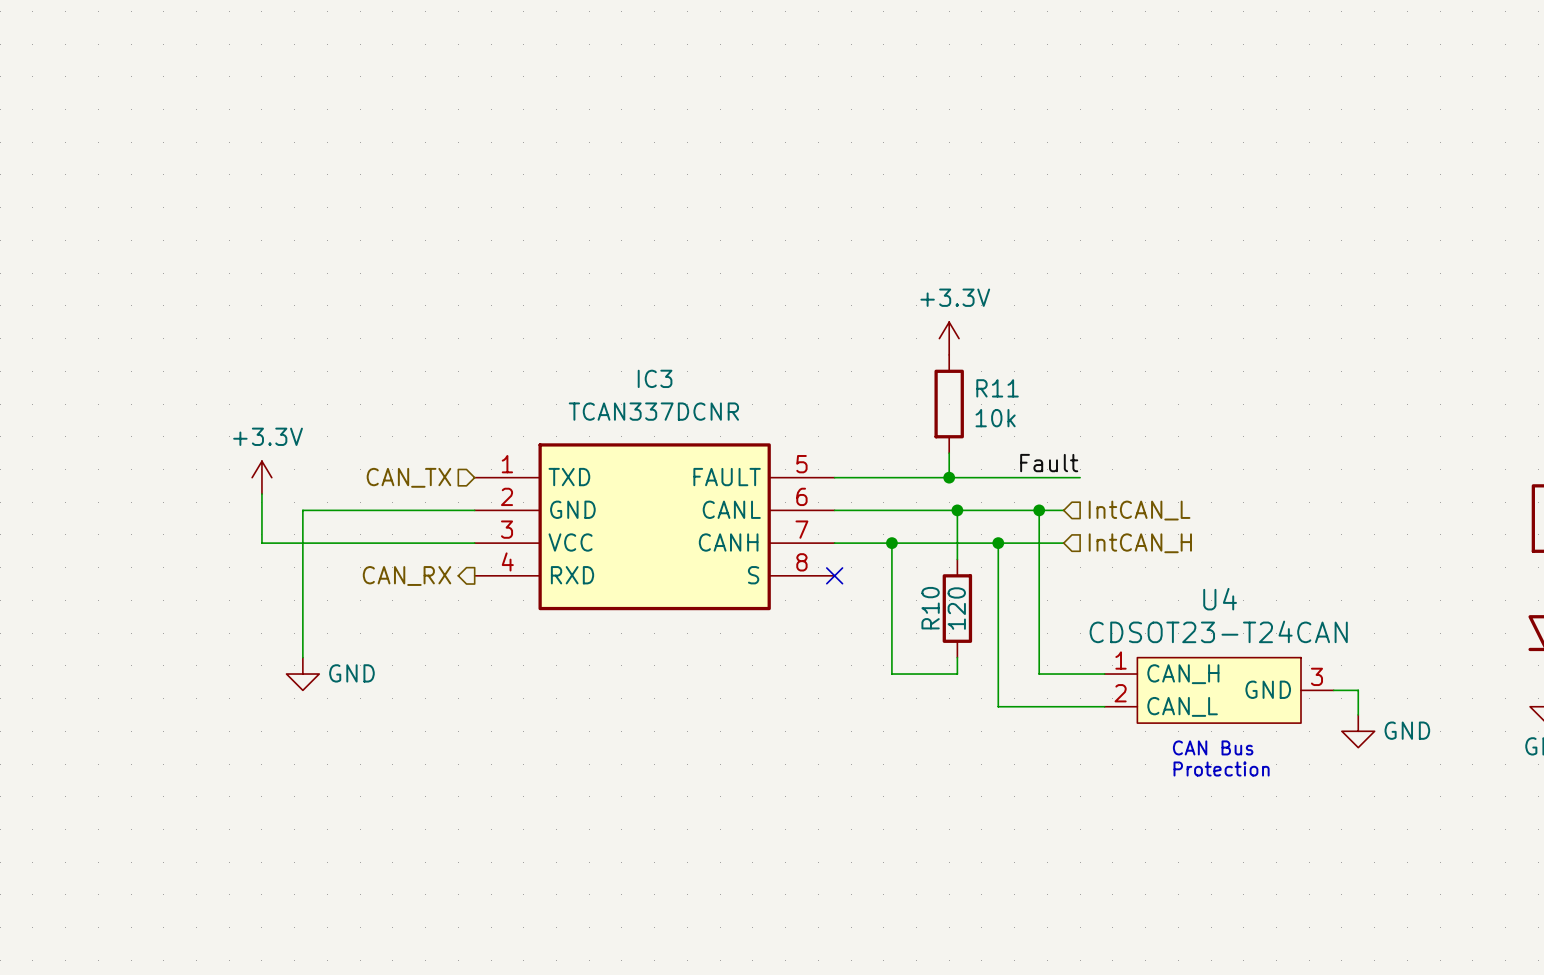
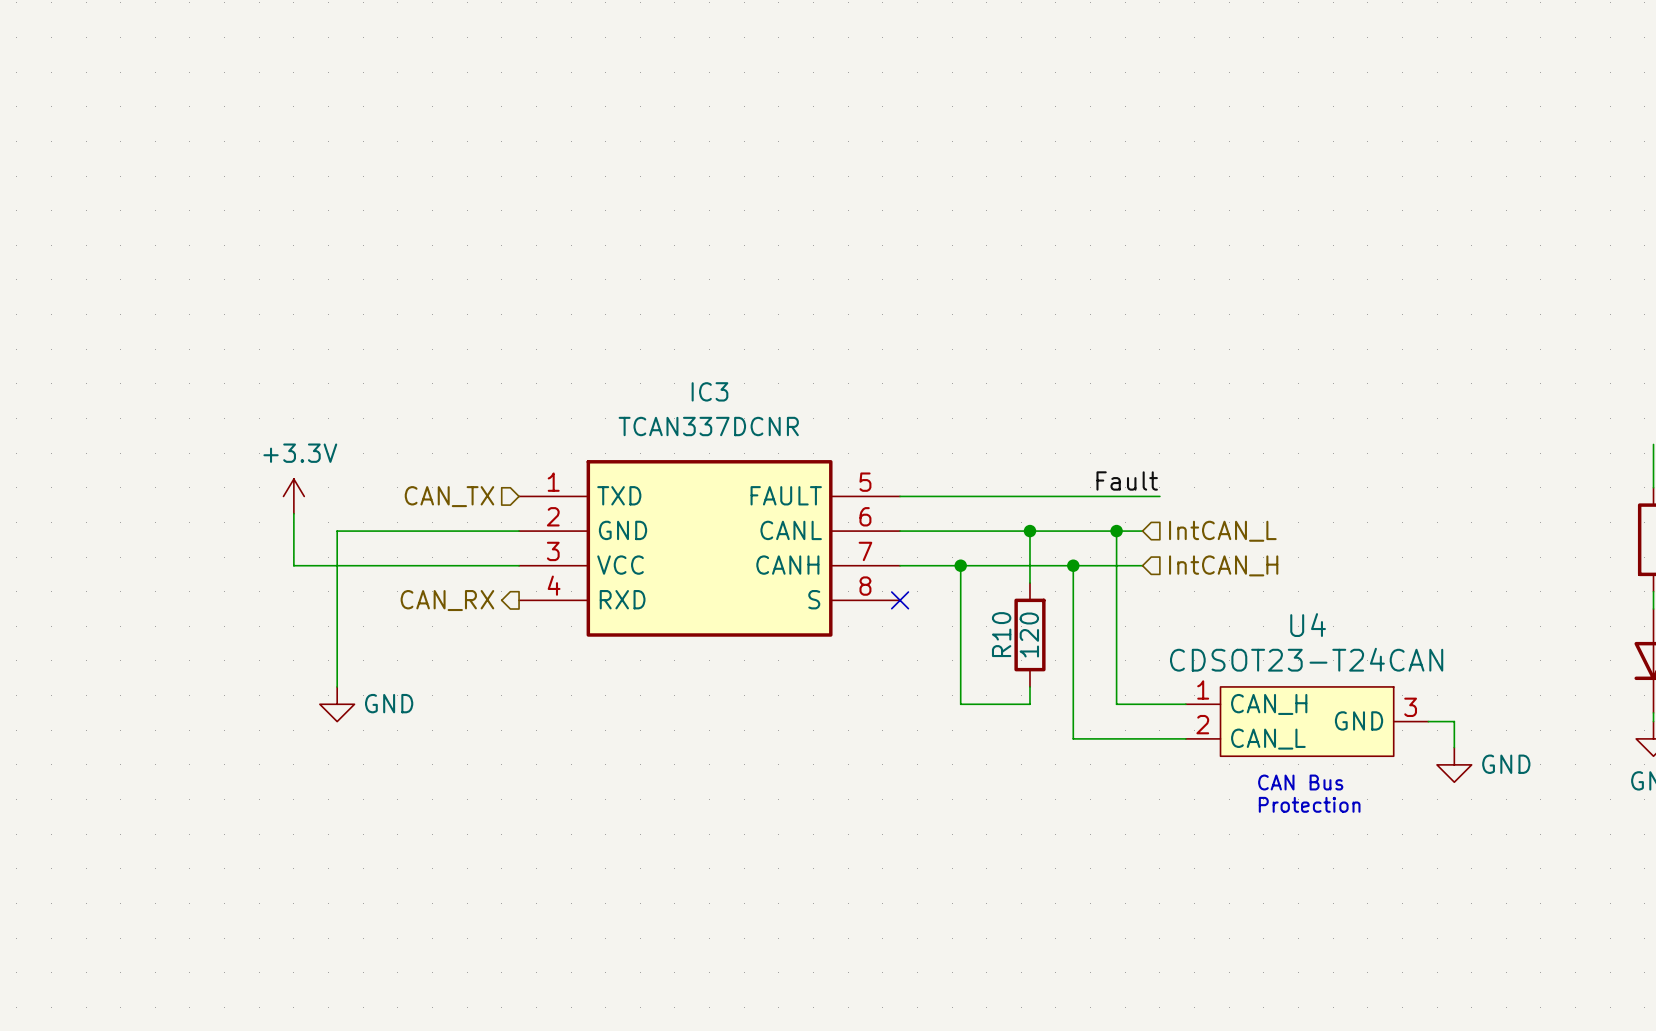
power symbol: +3.3V (949, 338) -> none
R11: 10k (949, 404) -> none
wire: (949, 453) (949, 477) -> none
junction: (949, 477) -> none

